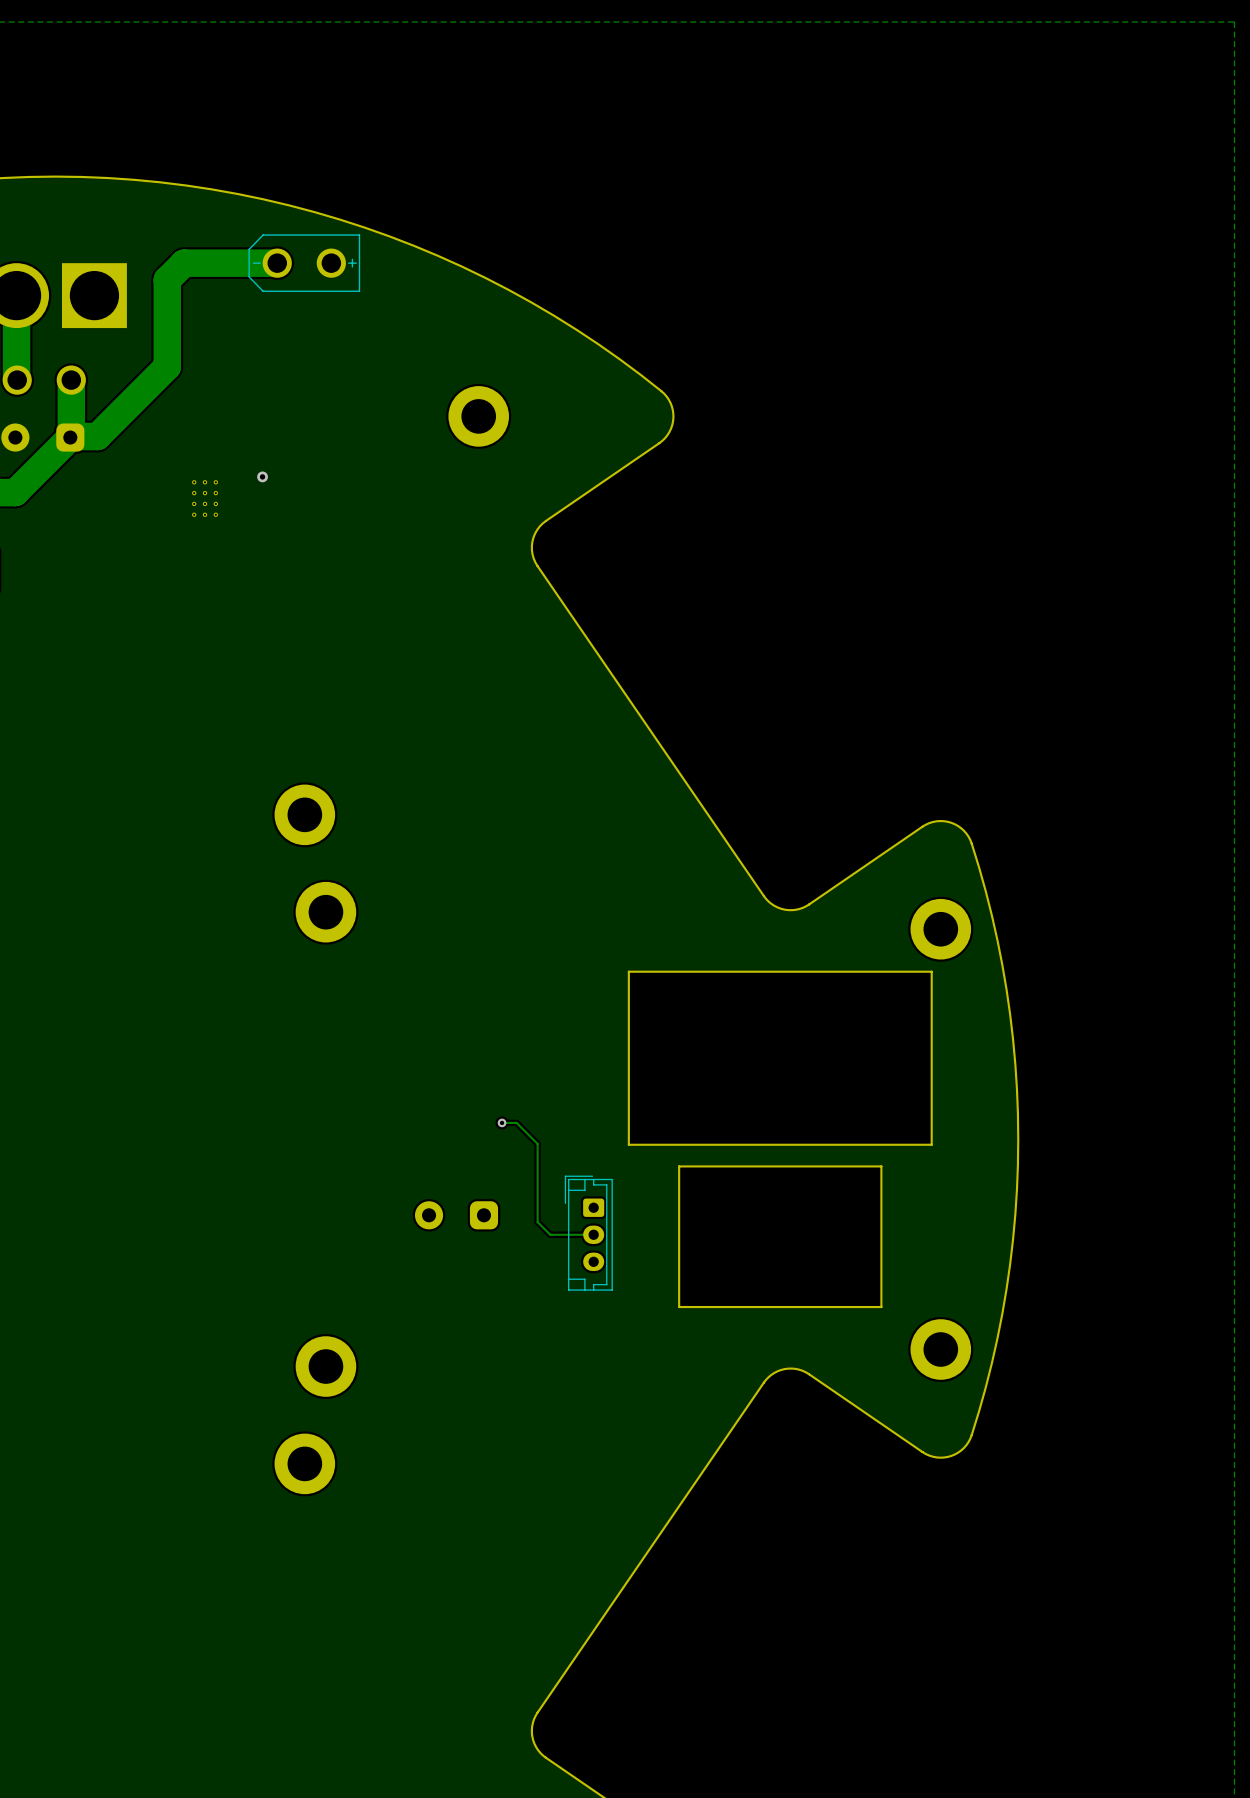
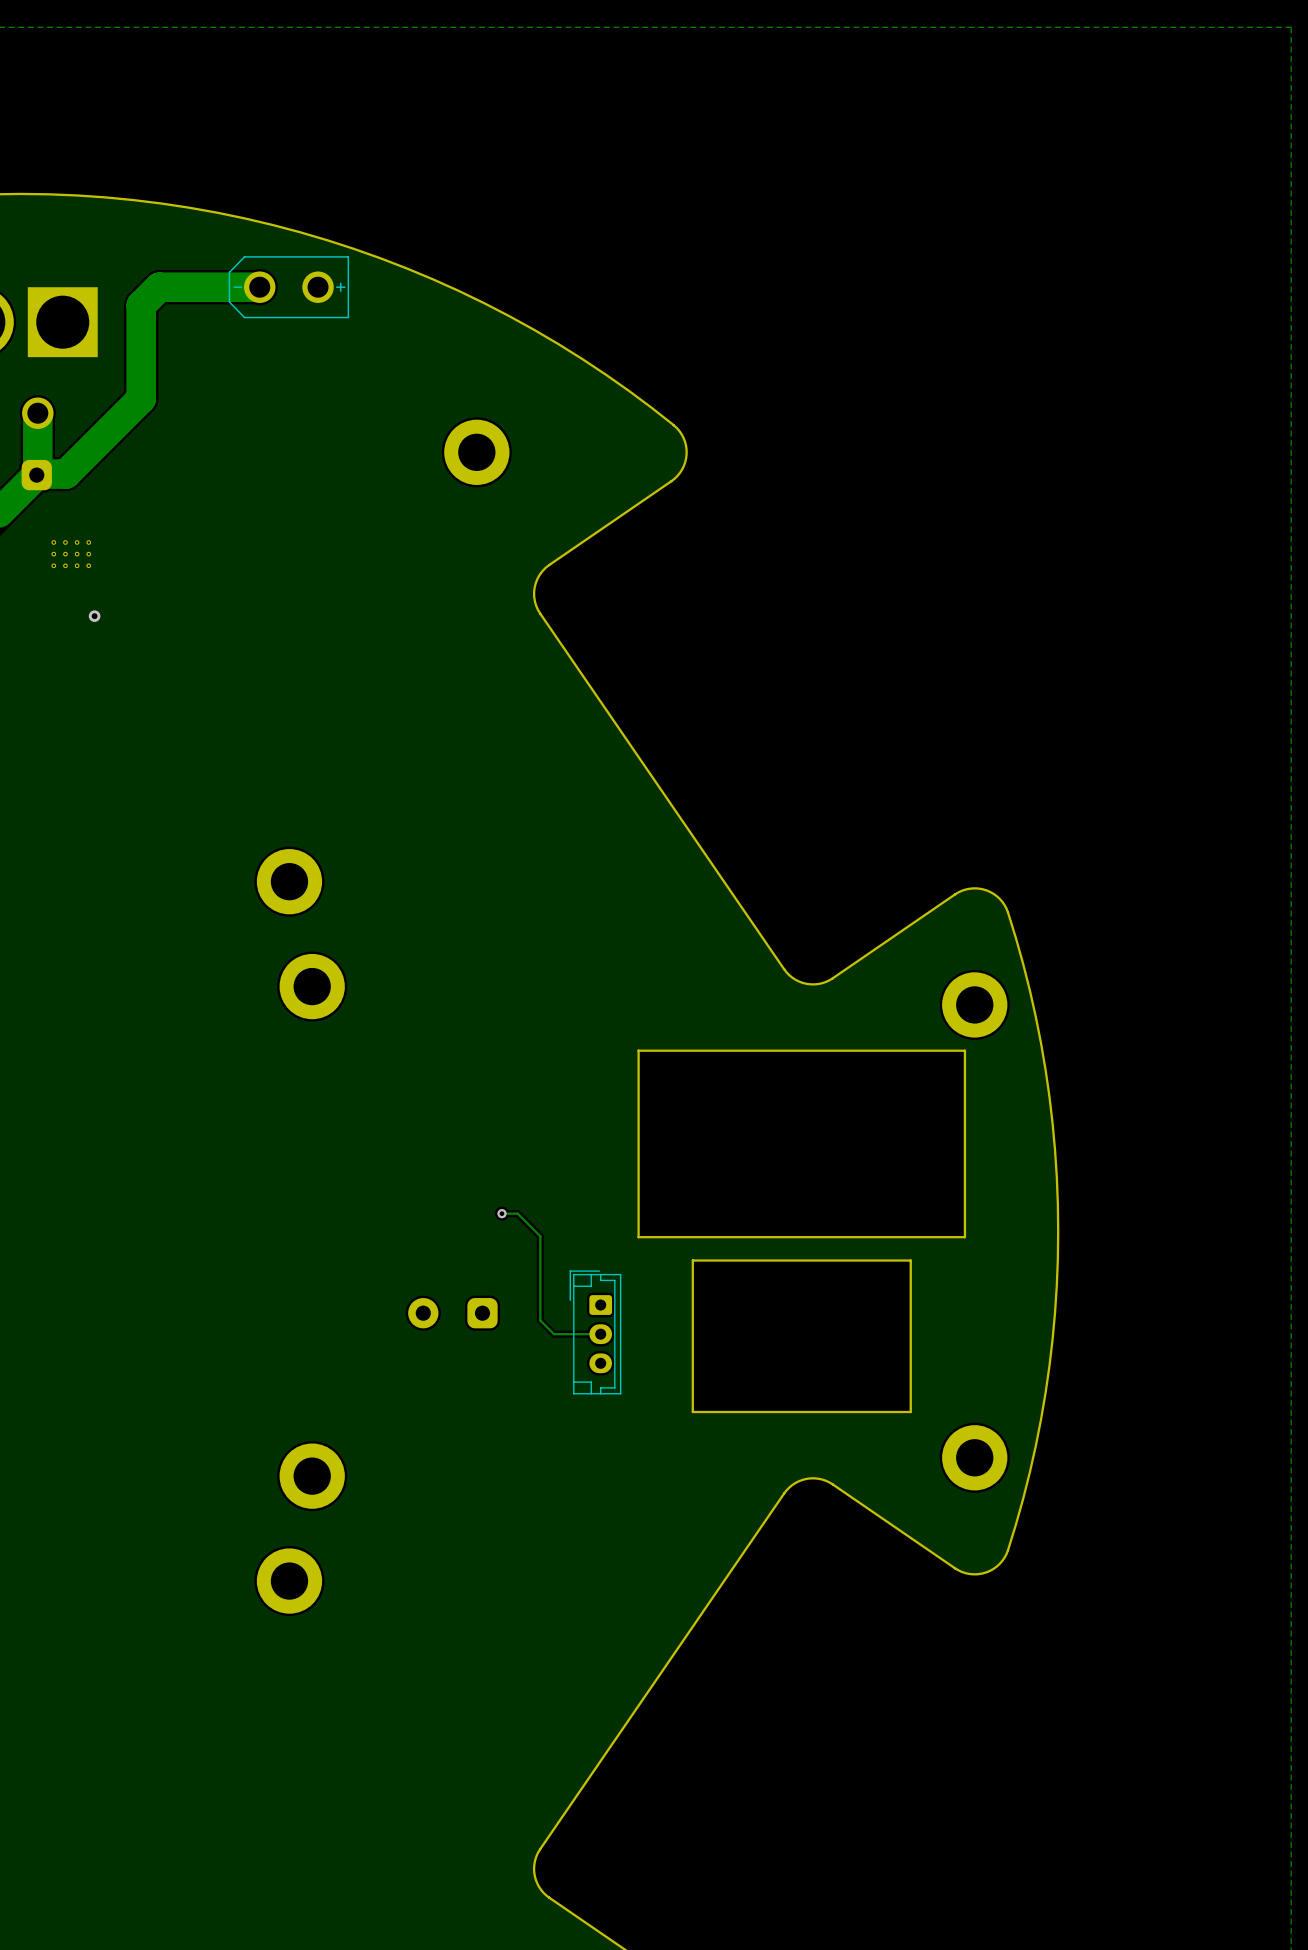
via: (262, 476) -> none
part rotation: 0° (205, 498) -> 90° clockwise (71, 554)
part position: (205, 498) -> (71, 554)
via: none -> (94, 616)

